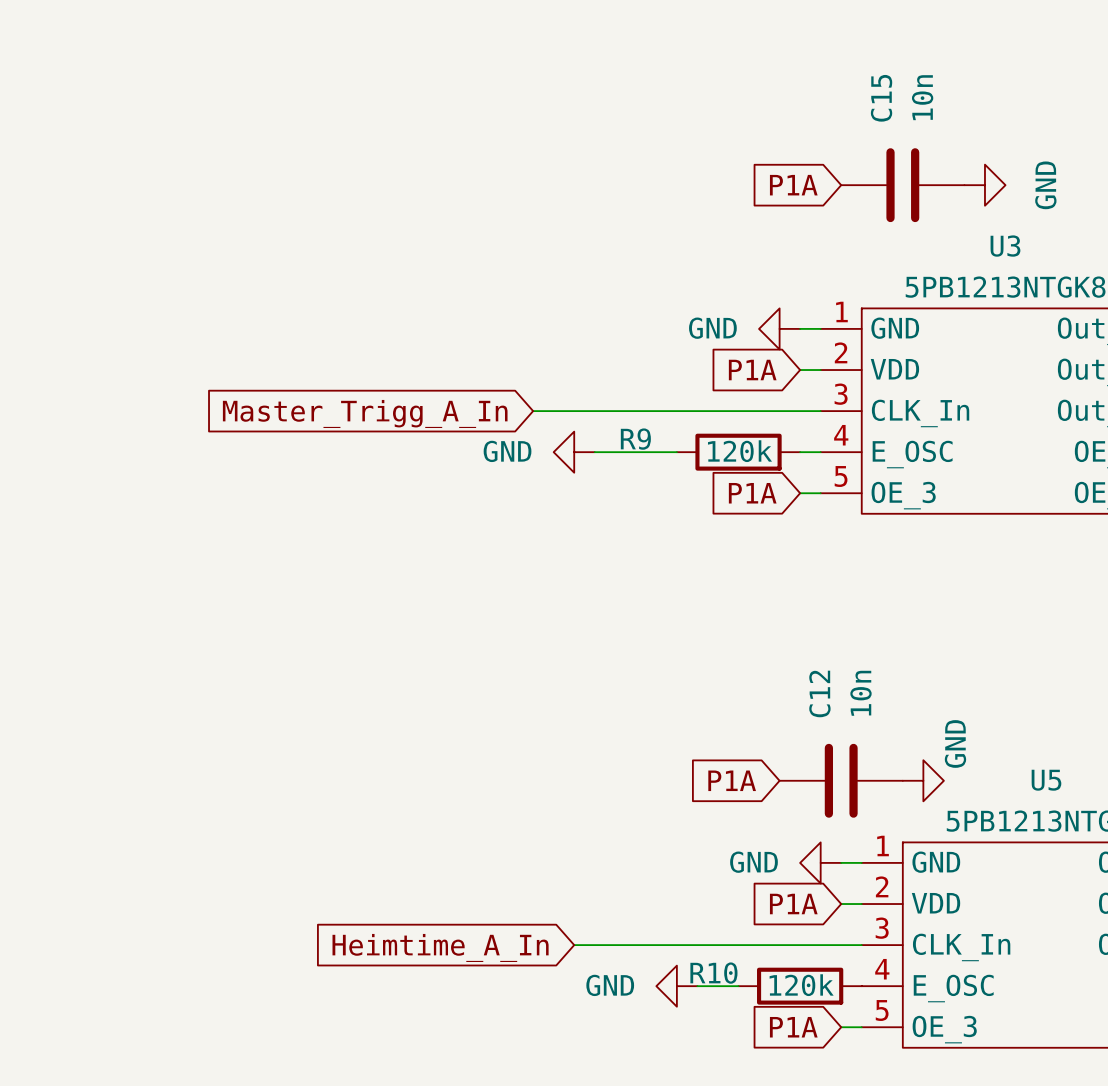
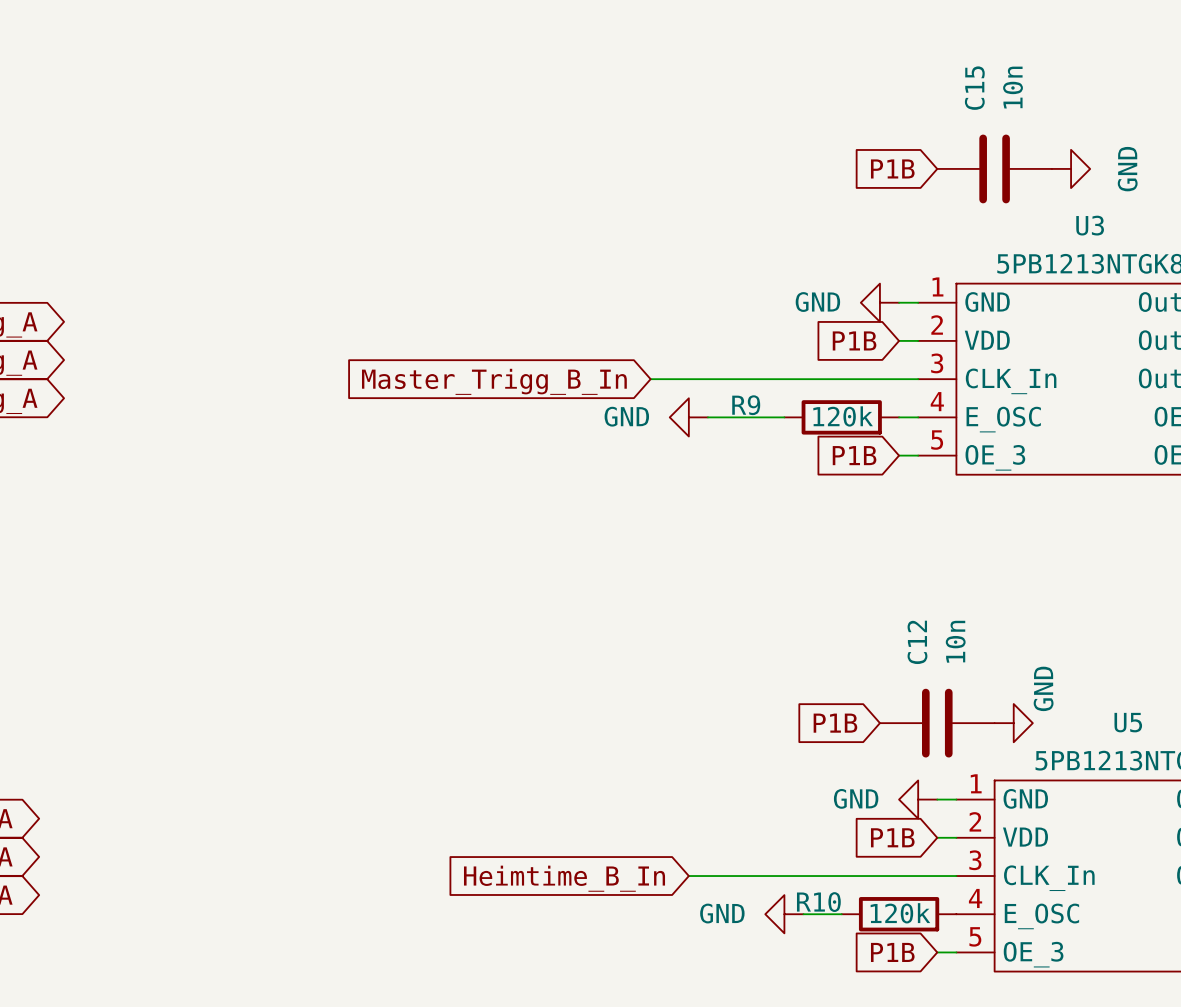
global label: P1A (793, 185) -> P1B (892, 168)
global label: P1A (752, 370) -> P1B (854, 340)
global label: Master_Trigg_A_In (365, 413) -> Master_Trigg_B_In (494, 381)
global label: P1A (752, 493) -> P1B (854, 455)
global label: P1A (732, 780) -> P1B (835, 723)
global label: P1A (793, 904) -> P1B (892, 837)
global label: Heimtime_A_In (440, 947) -> Heimtime_B_In (564, 878)
global label: P1A (793, 1027) -> P1B (892, 952)

